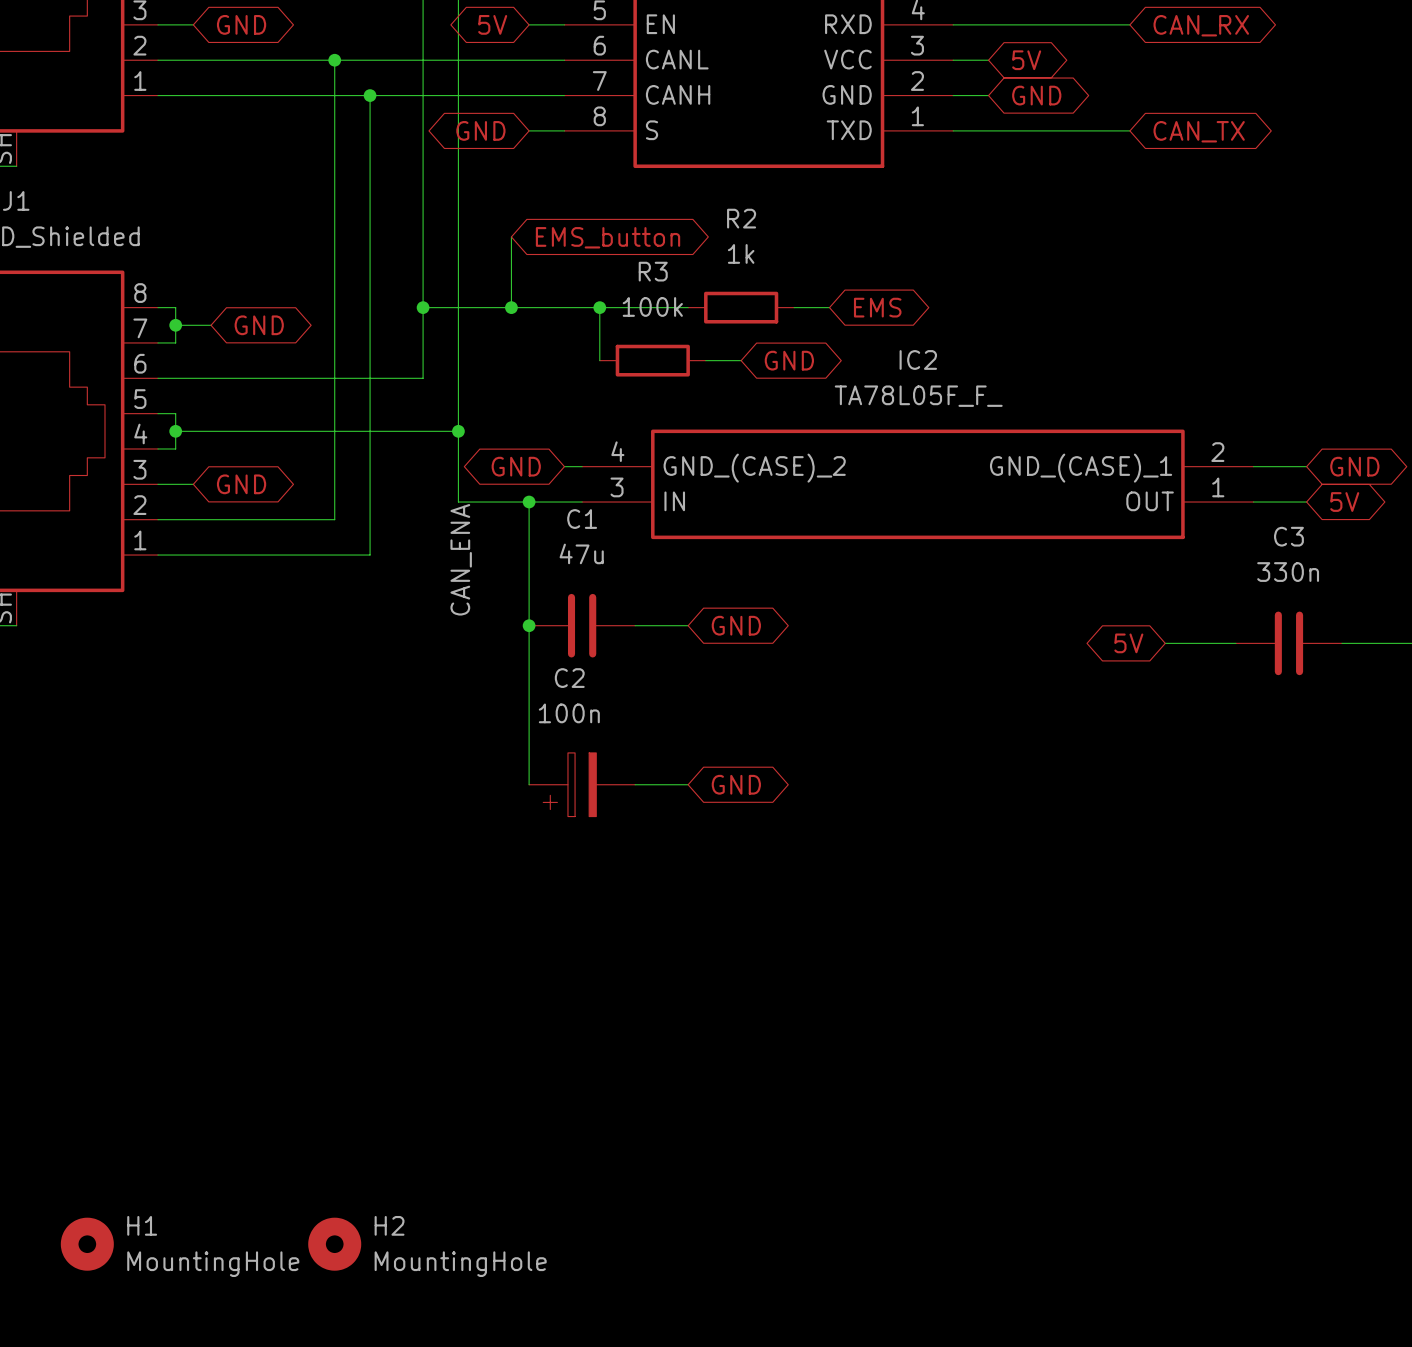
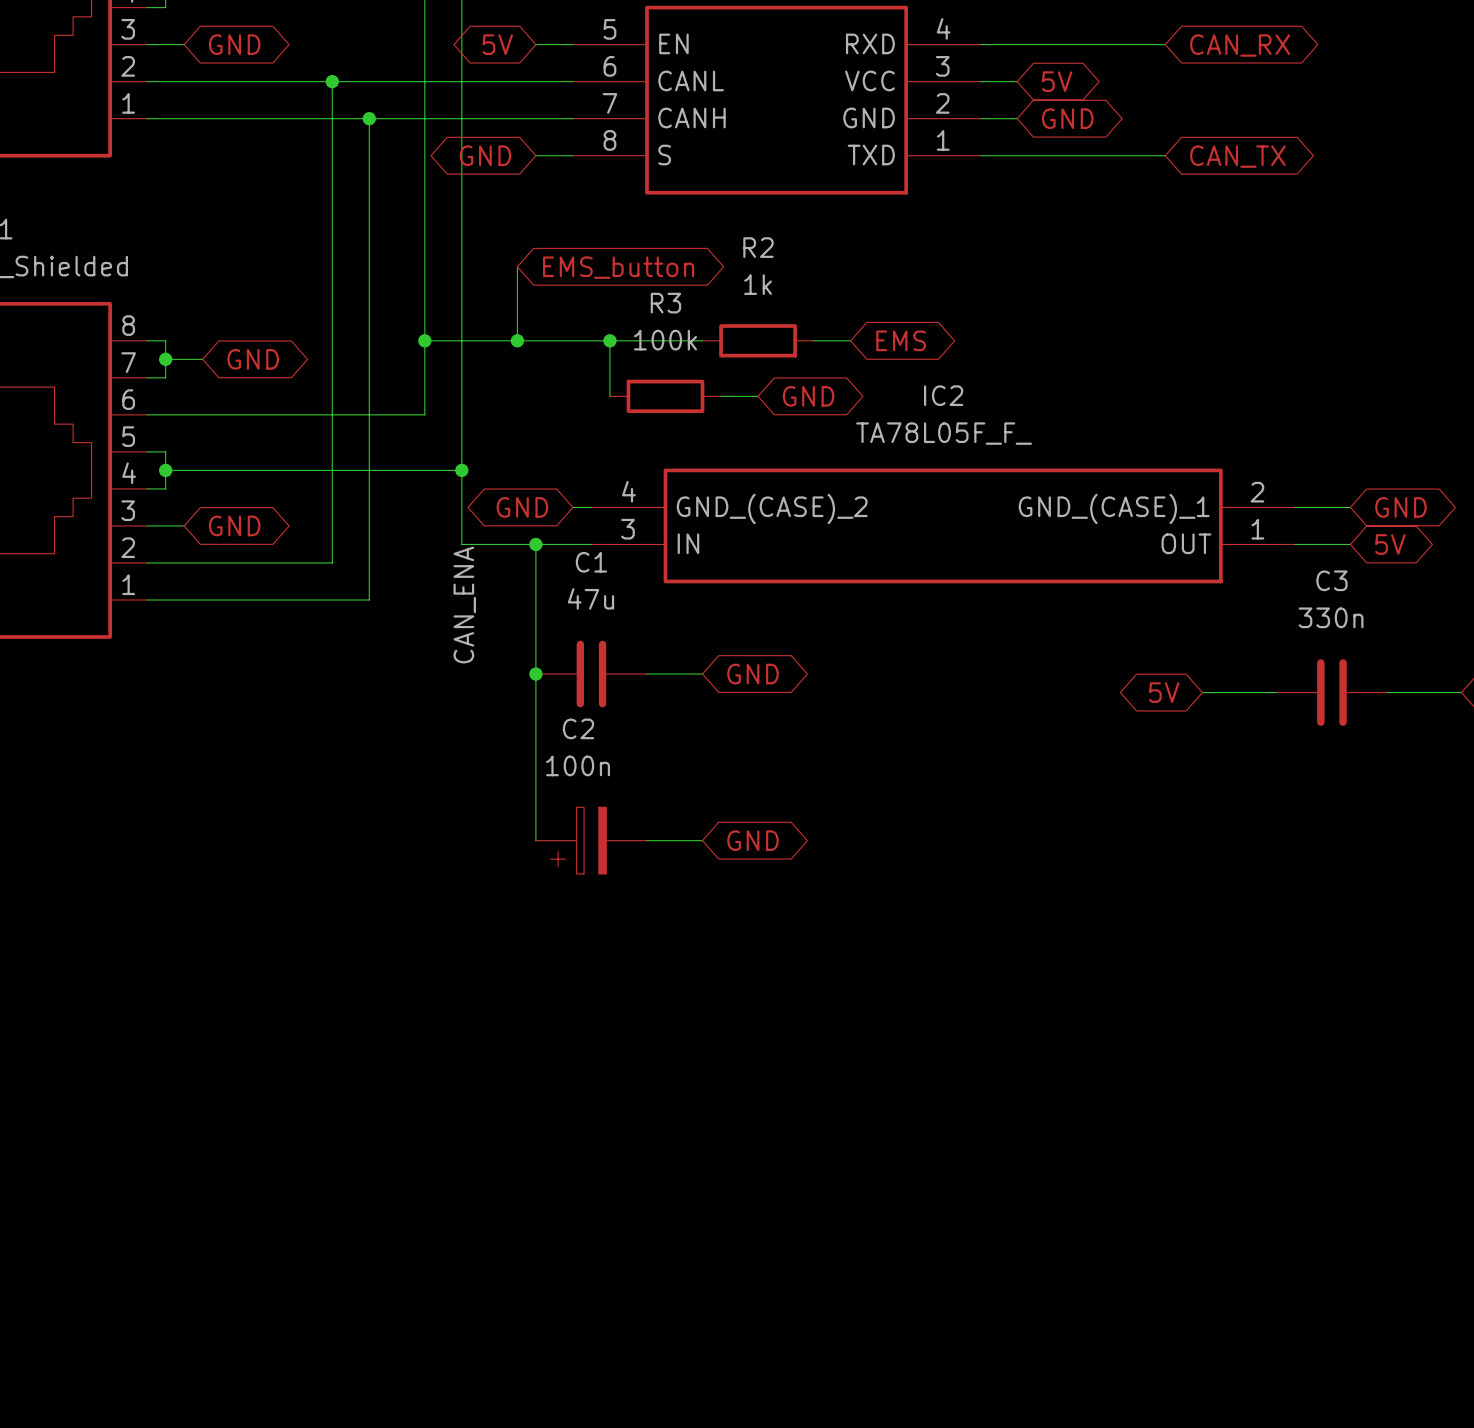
H1: MountingHole (87, 1244) -> none
H2: MountingHole (334, 1244) -> none

